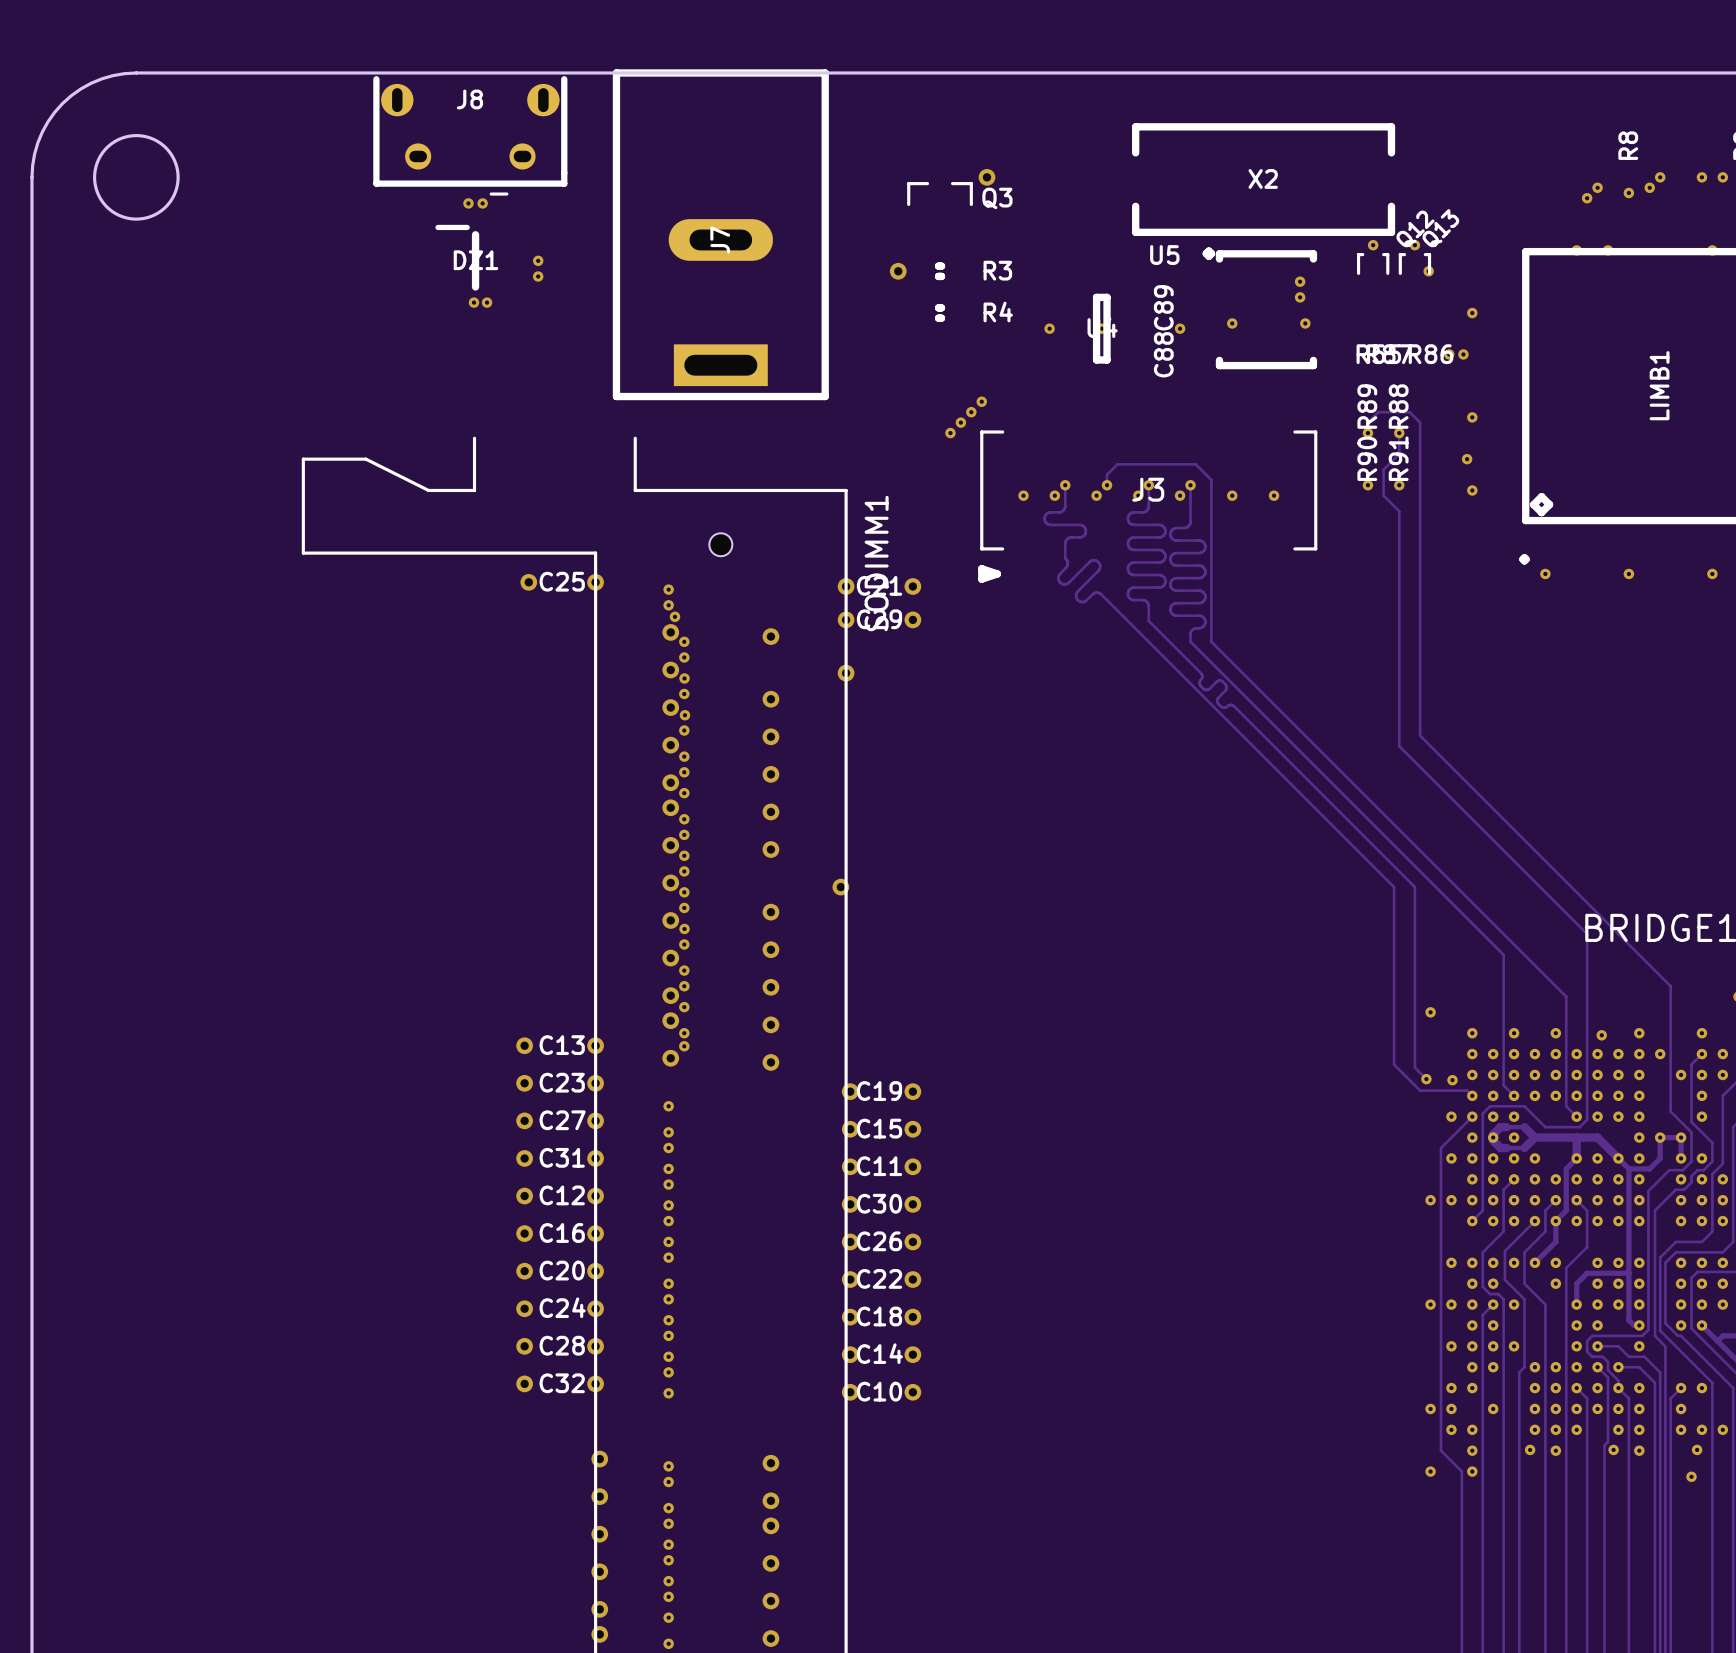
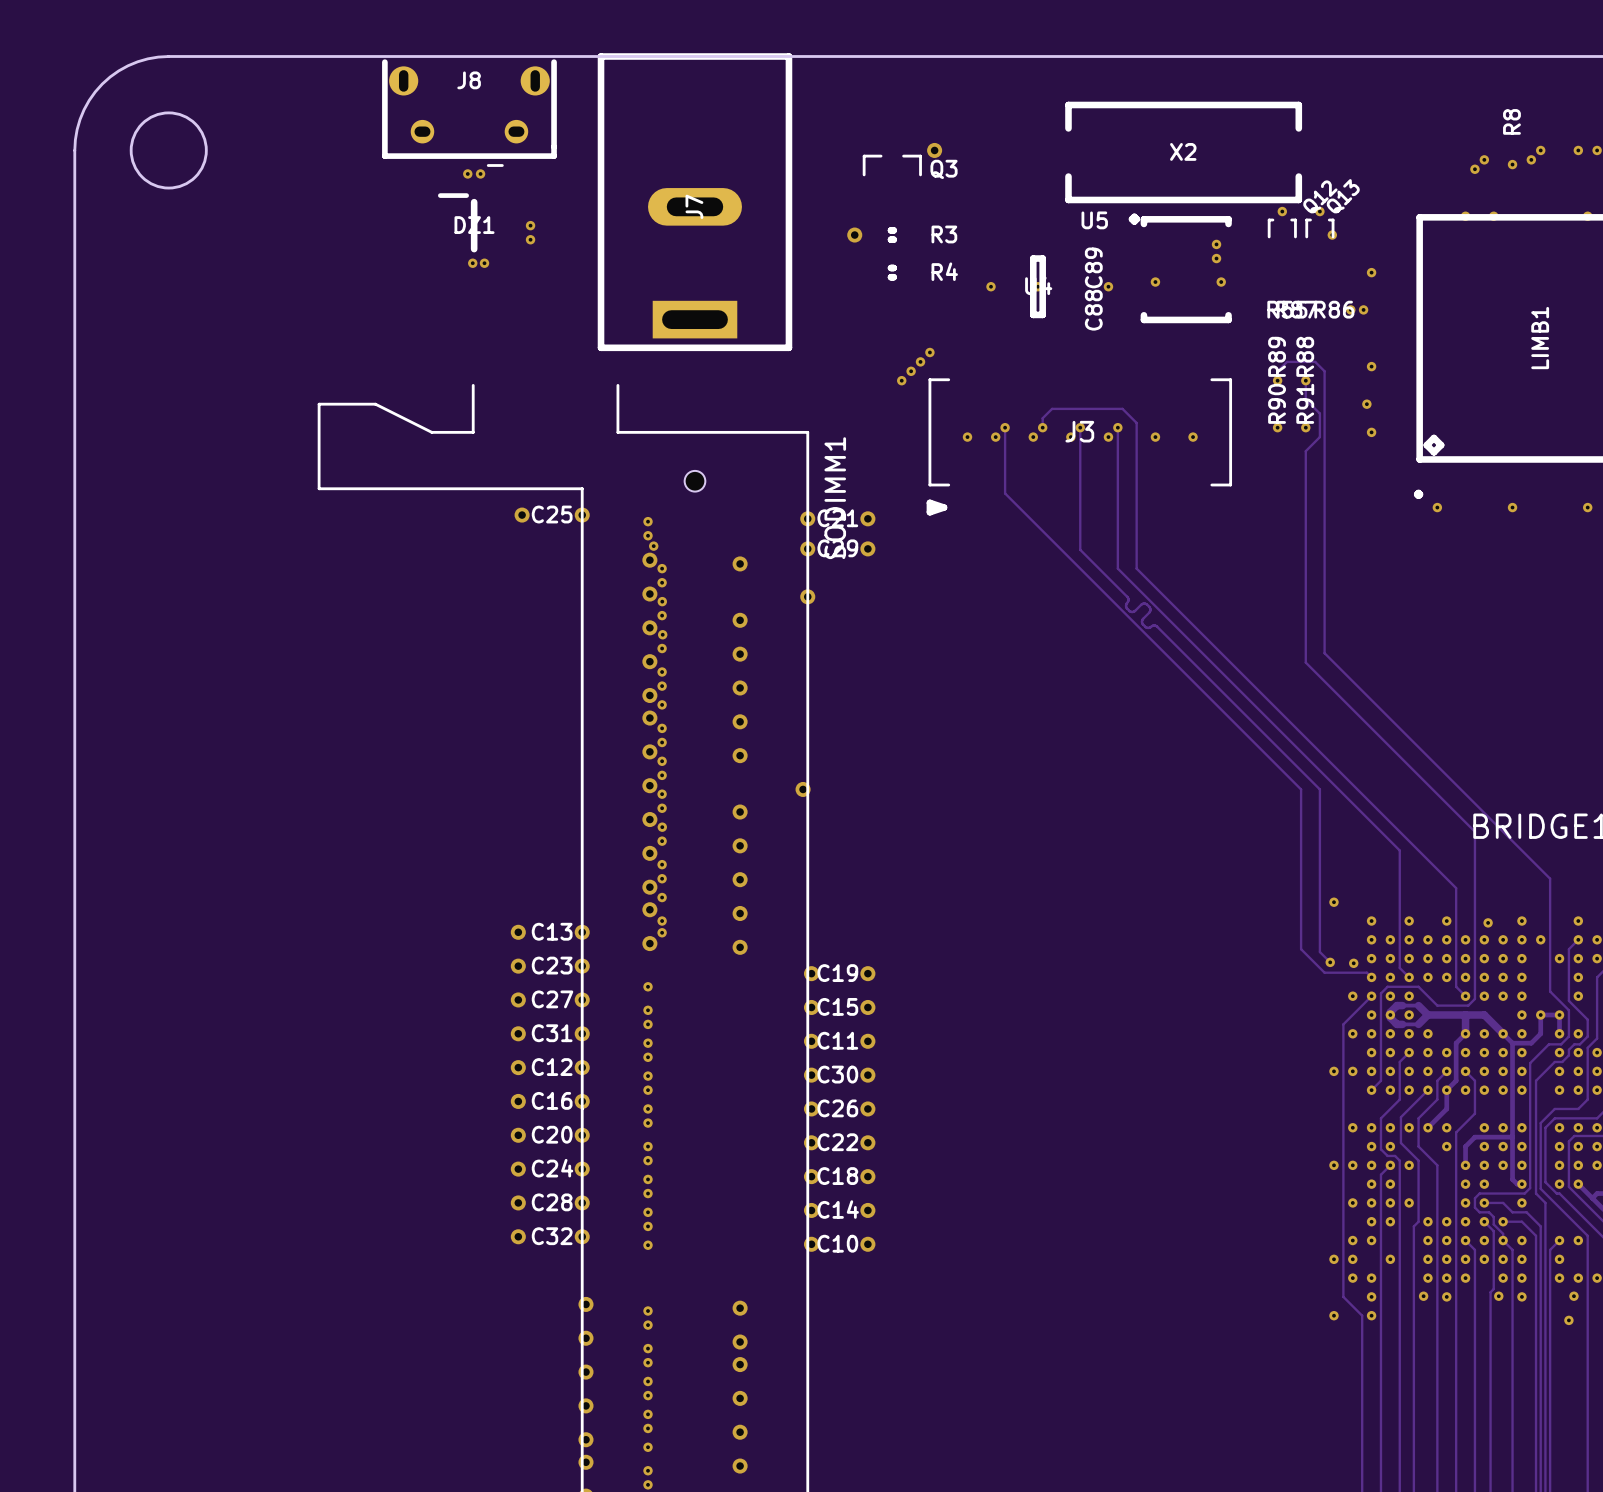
track: (1399, 453) (1383, 469) (1383, 495) (1399, 511) -> (1305, 399) (1319, 413) (1319, 437) (1305, 451)
track: (1065, 506) (1061, 511) (1048, 513) (1044, 518) (1049, 524) (1079, 524) (1084, 527) (1085, 532) (1083, 536) (1068, 538) (1065, 543) -> (1005, 446) (1005, 480)
track: (1148, 506) (1145, 511) (1131, 513) (1127, 518) (1132, 524) (1160, 525) (1165, 529) (1164, 533) (1160, 537) (1132, 537) (1128, 542) (1128, 546) (1132, 549) (1160, 550) (1165, 554) (1164, 558) (1160, 562) (1132, 562) (1128, 567) (1128, 571) (1132, 574) (1160, 575) (1164, 578) (1164, 583) (1160, 587) (1132, 587) (1128, 591) (1130, 598) (1145, 600) (1148, 606) -> (1080, 446) (1080, 536)
track: (1190, 521) (1186, 527) (1173, 528) (1170, 534) (1175, 540) (1200, 540) (1205, 545) (1201, 552) (1175, 553) (1170, 557) (1173, 565) (1200, 565) (1205, 570) (1201, 577) (1175, 578) (1170, 583) (1171, 587) (1175, 590) (1200, 590) (1204, 594) (1205, 598) (1201, 602) (1175, 603) (1171, 606) (1171, 612) (1175, 615) (1199, 615) (1204, 618) (1204, 625) (1192, 629) (1190, 634) -> (1117, 460) (1117, 562)
track: (1066, 559) (1067, 565) (1058, 577) (1059, 581) (1063, 584) (1069, 582) (1090, 561) (1098, 562) (1099, 569) (1077, 591) (1076, 596) (1079, 601) (1083, 602) (1094, 592) (1101, 594) -> (1005, 494) (1037, 526)

